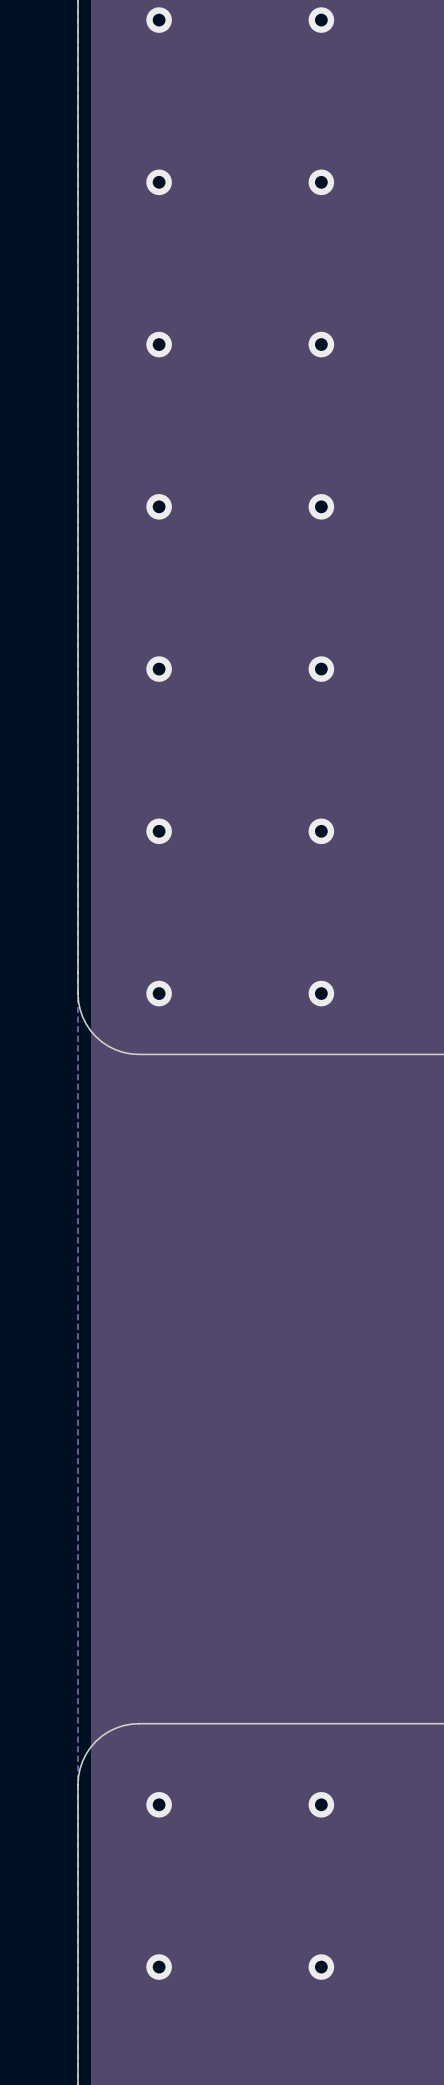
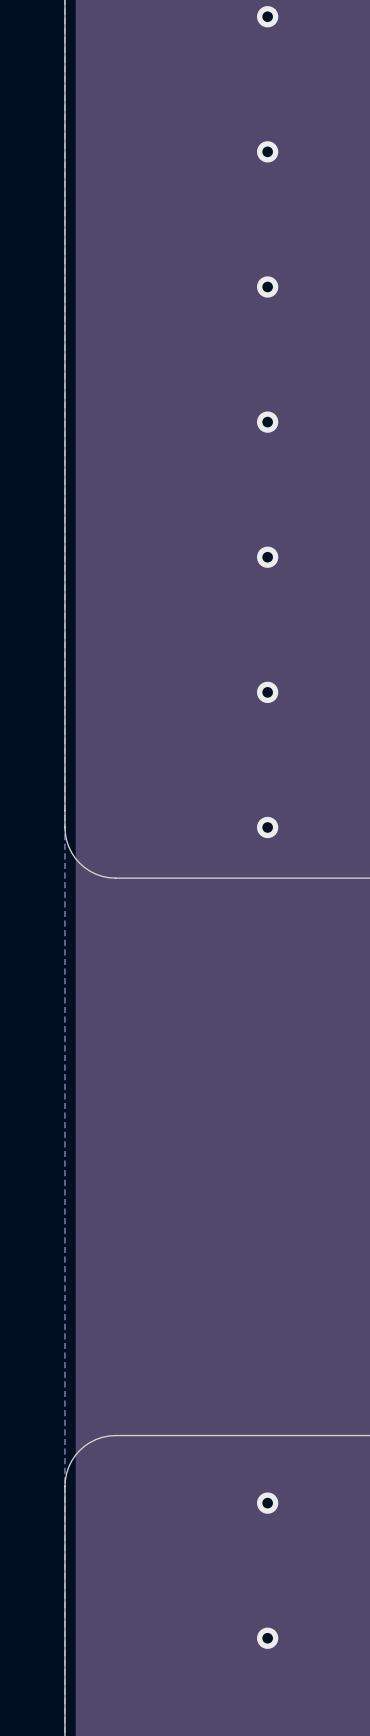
via: (159, 20) -> none
via: (159, 182) -> none
via: (159, 344) -> none
via: (159, 506) -> none
via: (159, 669) -> none
via: (159, 831) -> none
via: (159, 993) -> none
via: (159, 1804) -> none
via: (159, 1967) -> none

